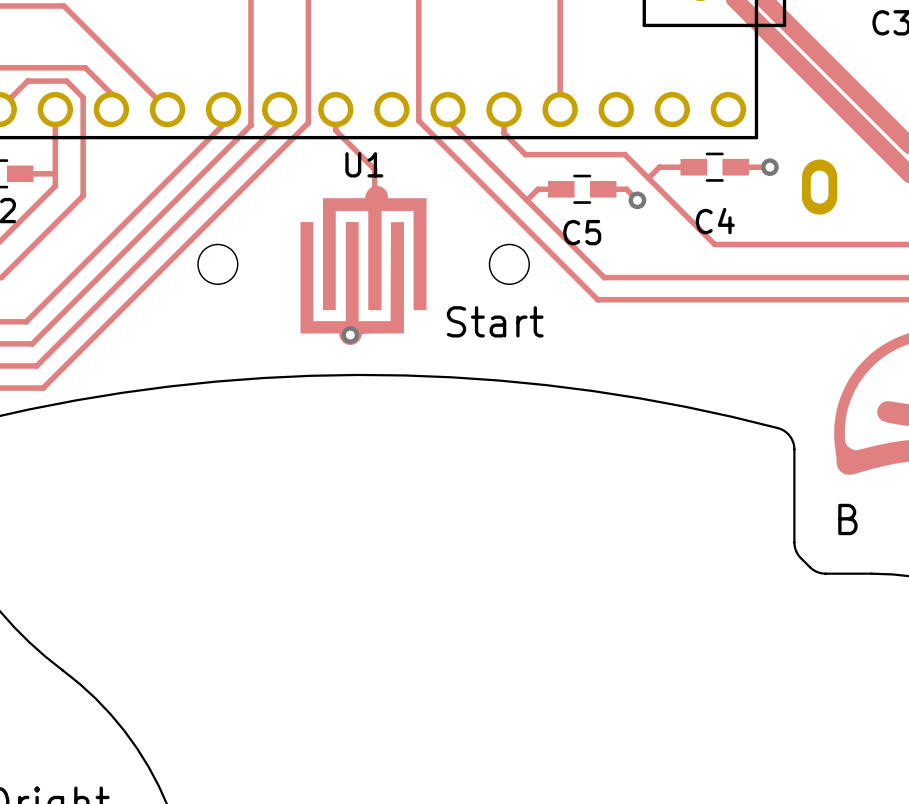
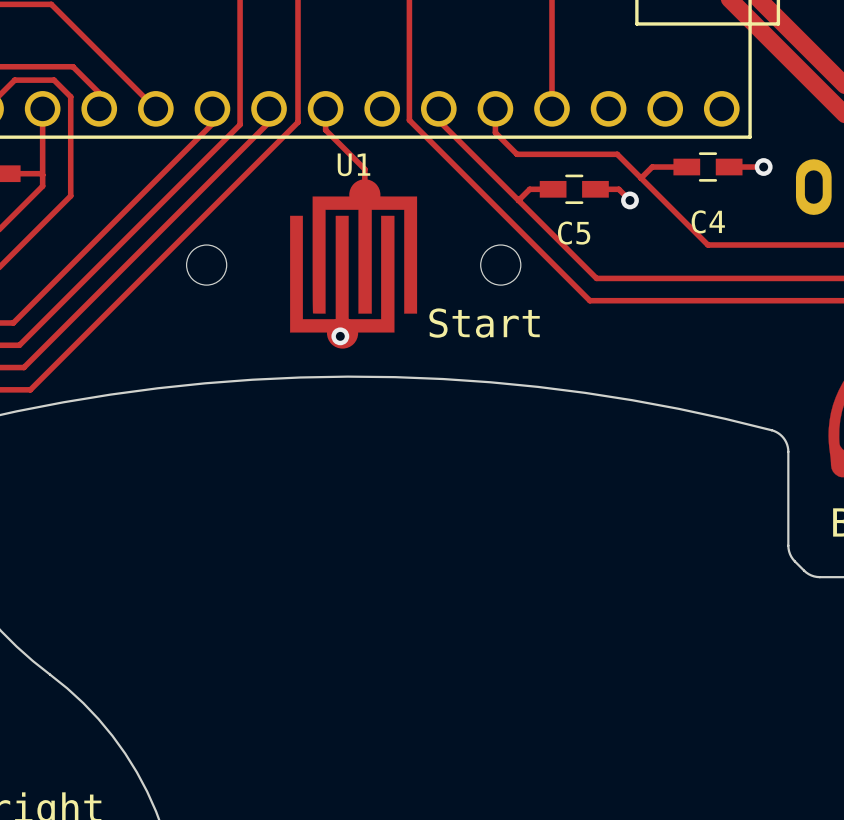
part footprint: [300, 185, 427, 345] -> [290, 179, 418, 349]

